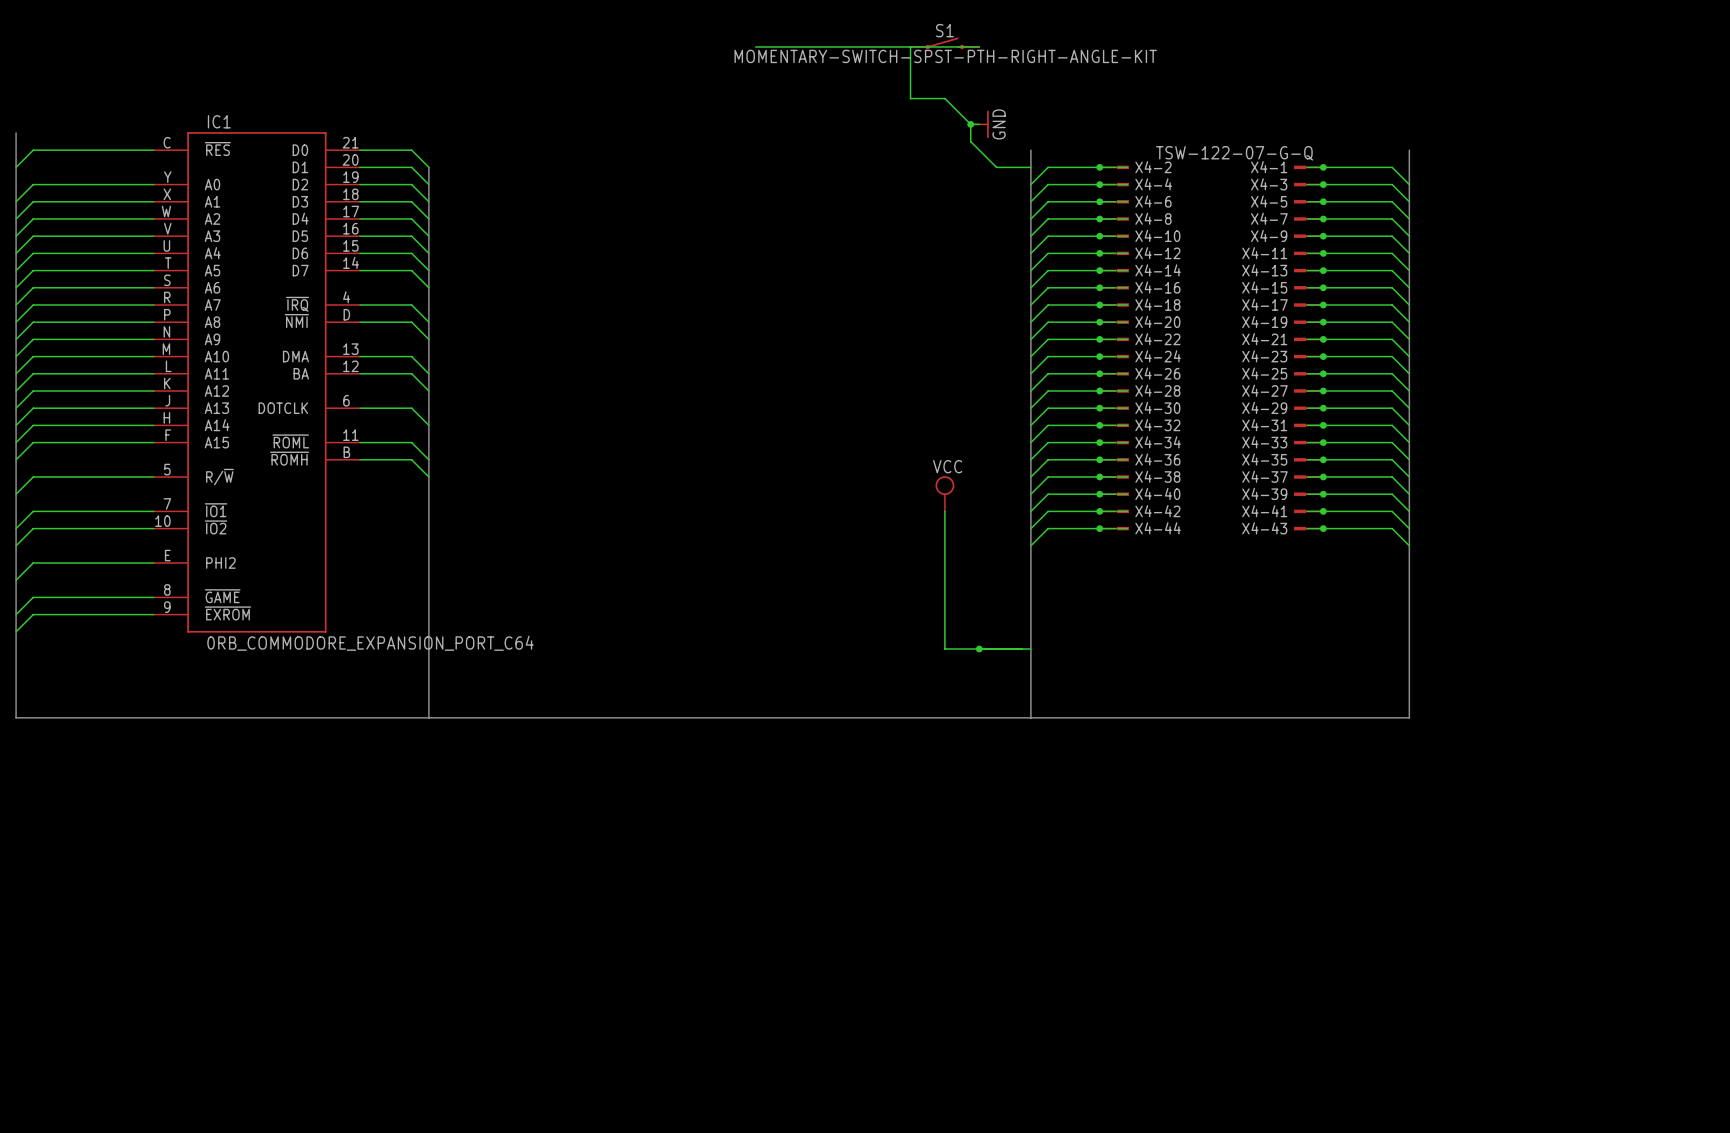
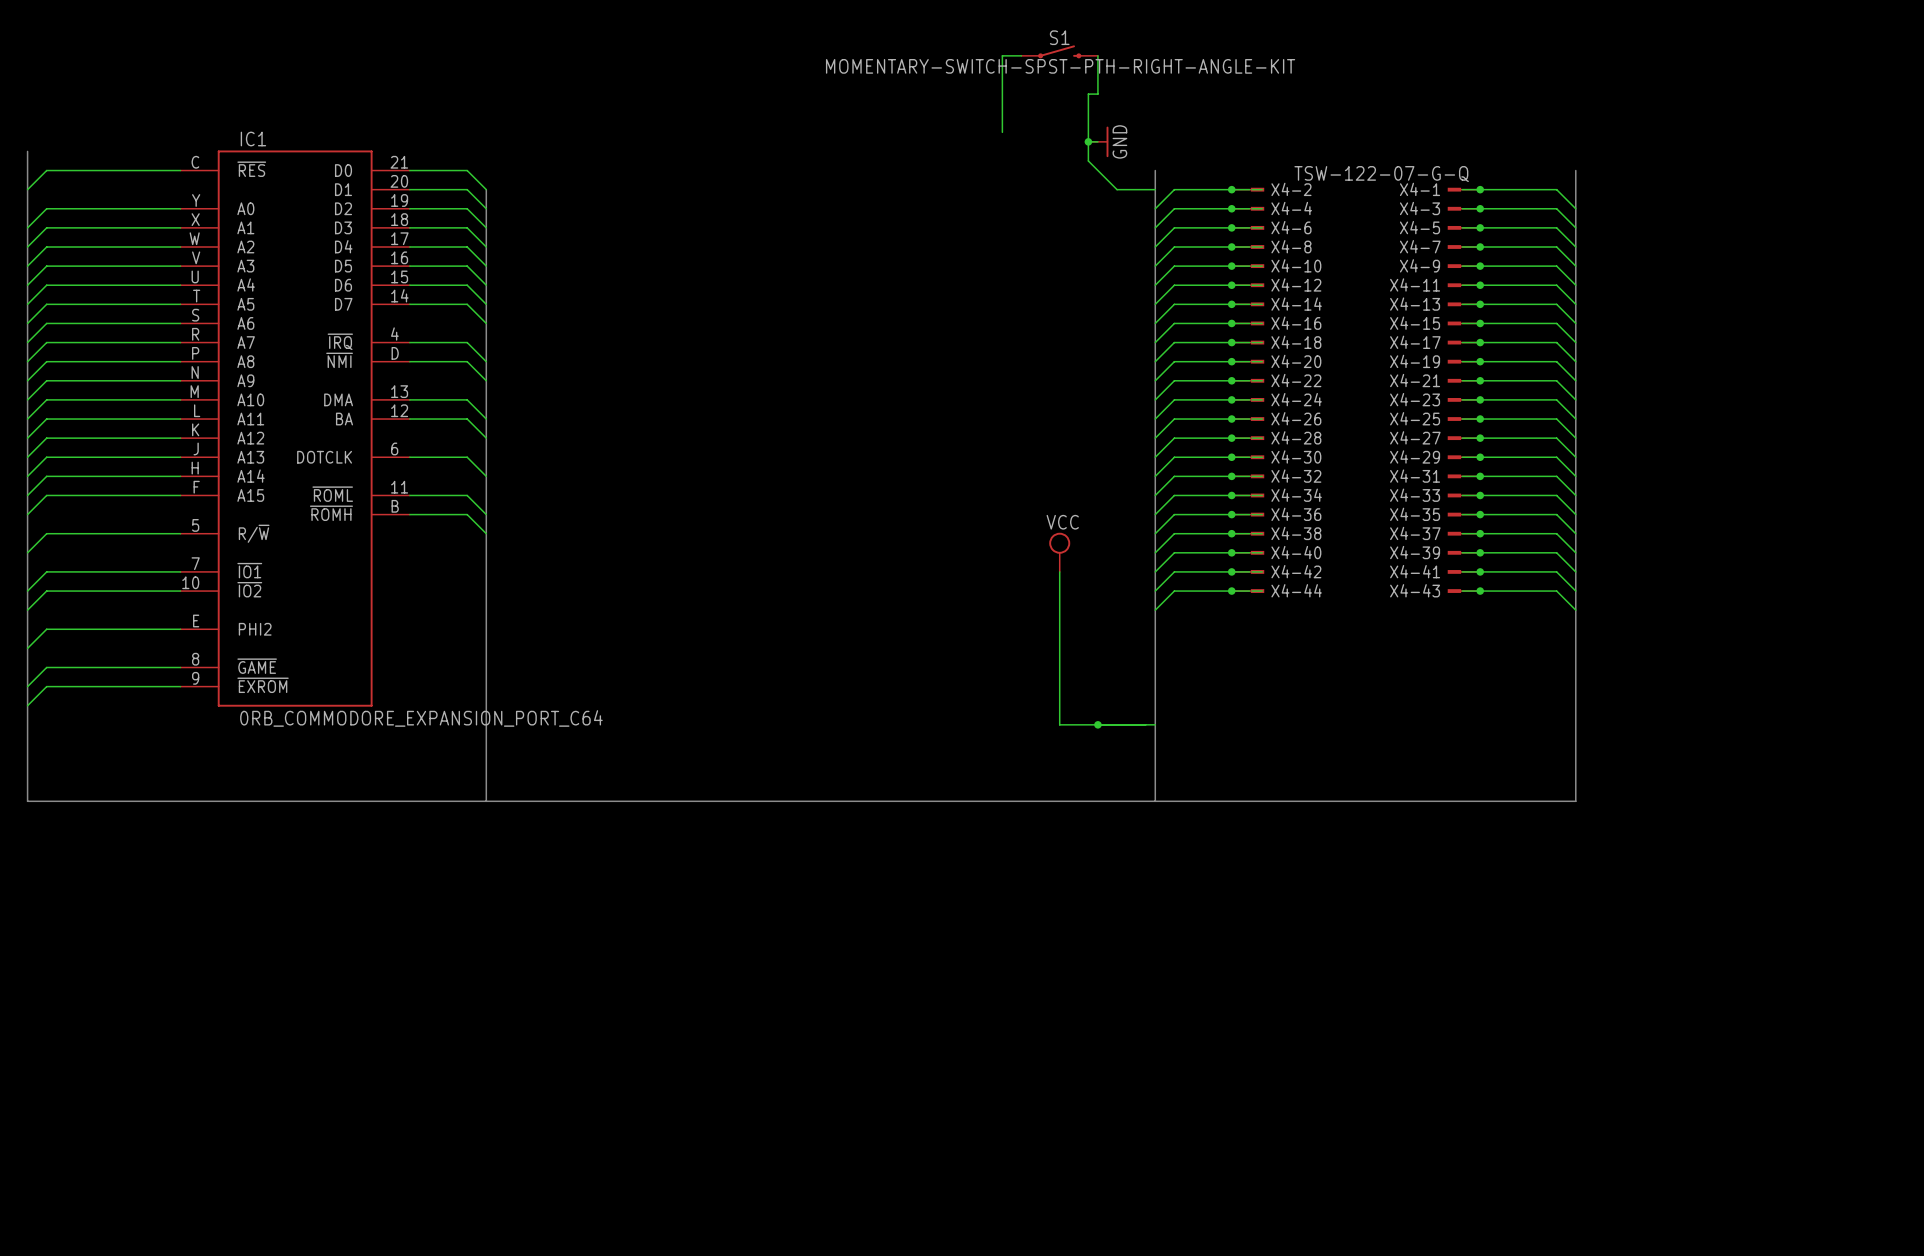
wire: (755, 46) (893, 46) -> (1002, 132) (1002, 55)
wire: (979, 46) (910, 46) (910, 98) (944, 98) (970, 124) -> (1097, 55) (1097, 94) (1088, 94) (1088, 141)

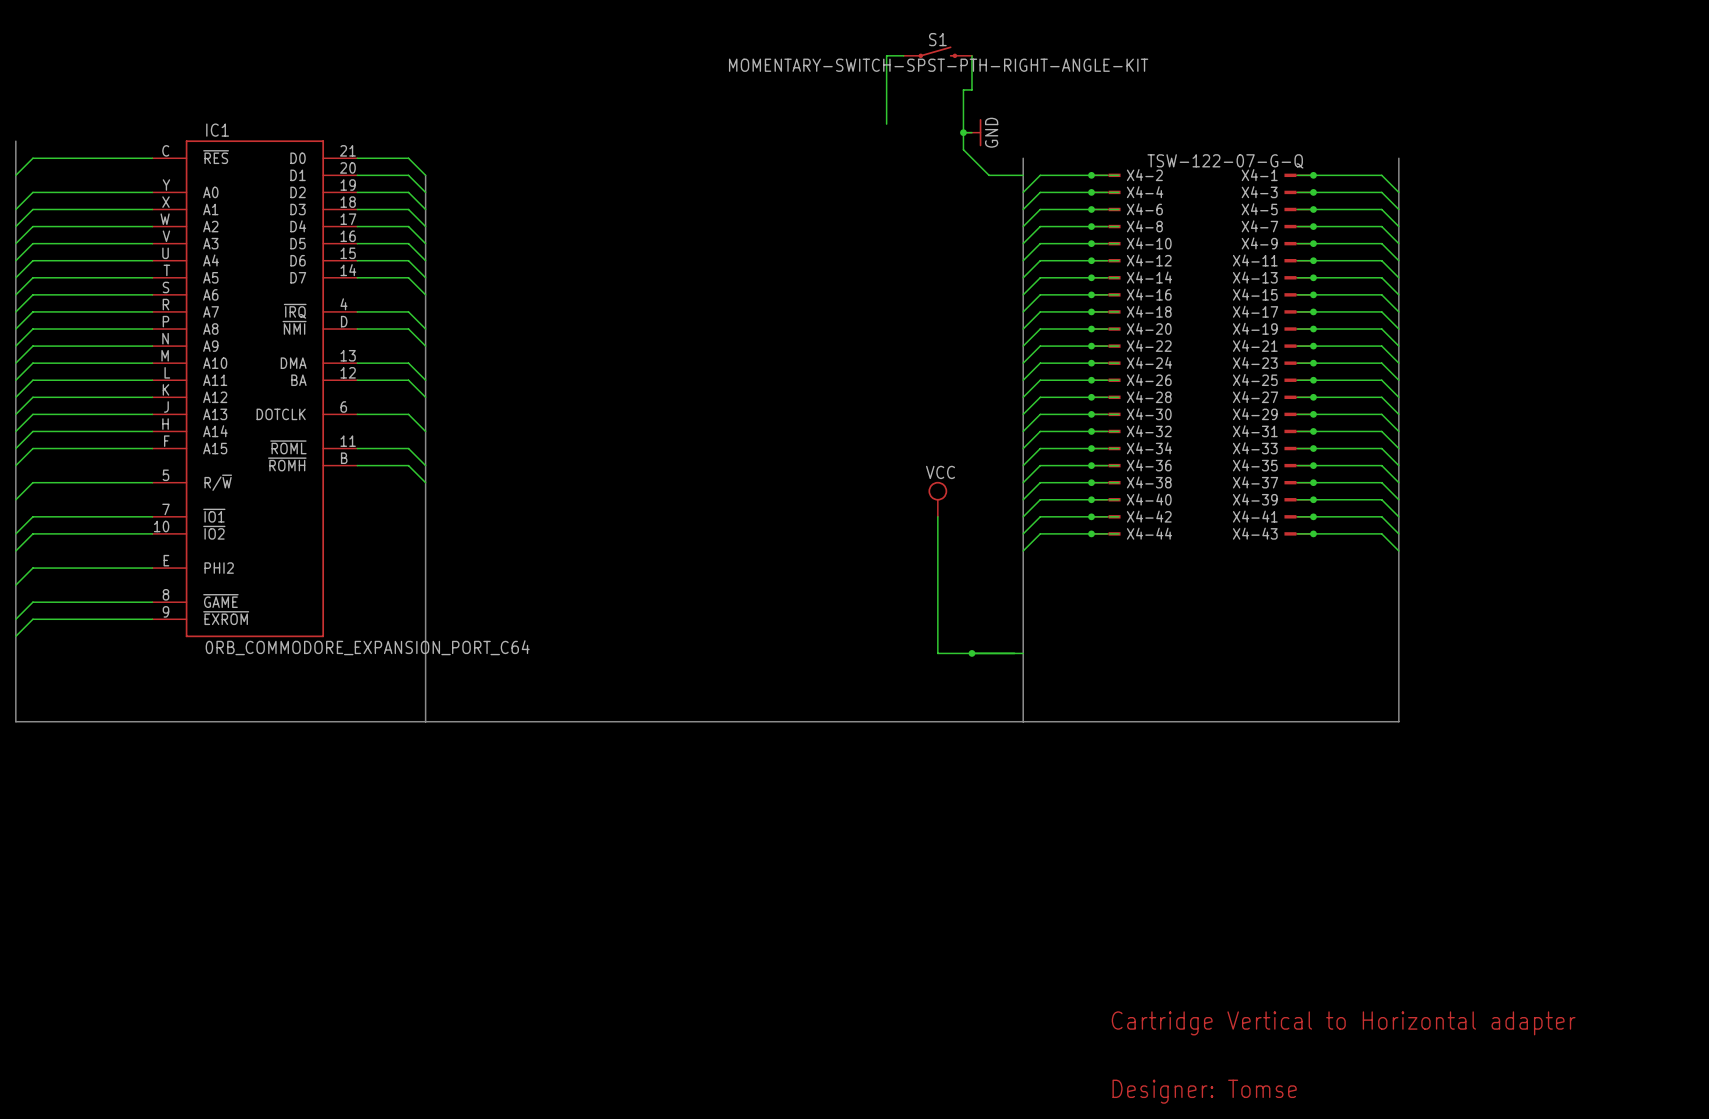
text: none -> Cartridge Vertical to Horizontal adapter (1343, 1023)
text: none -> Designer: Tomse (1204, 1091)

